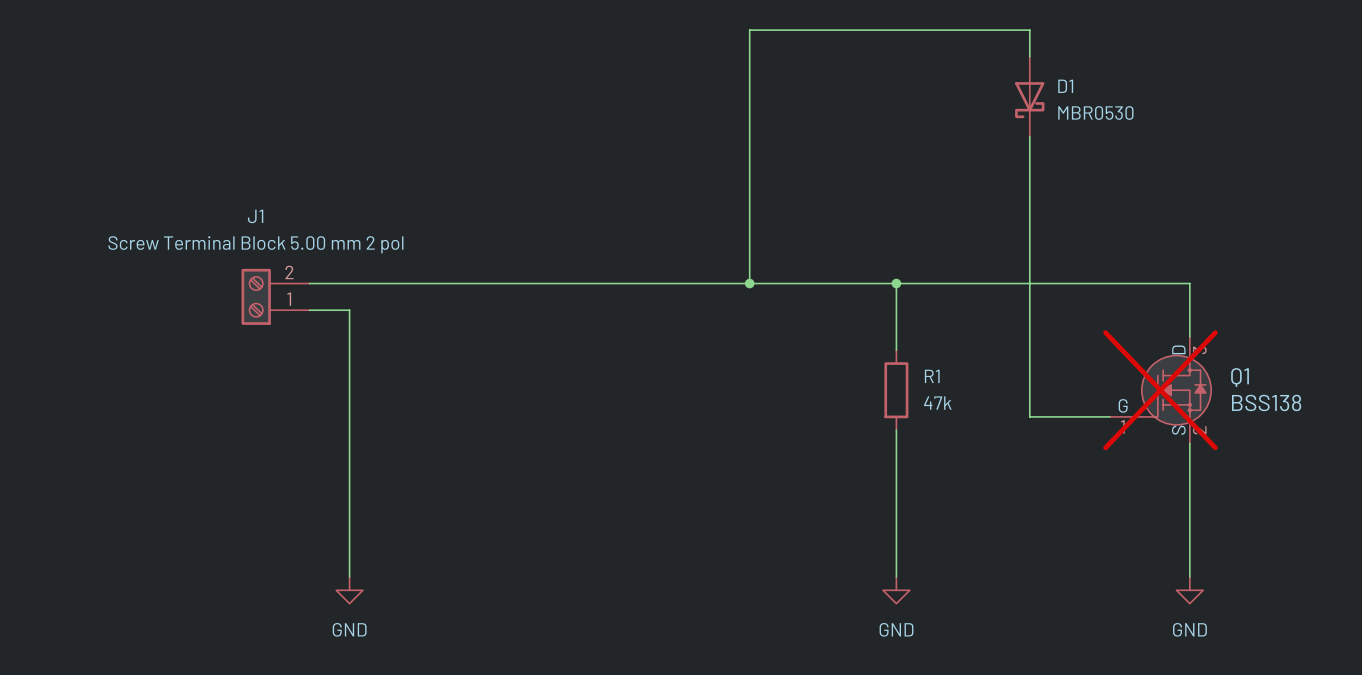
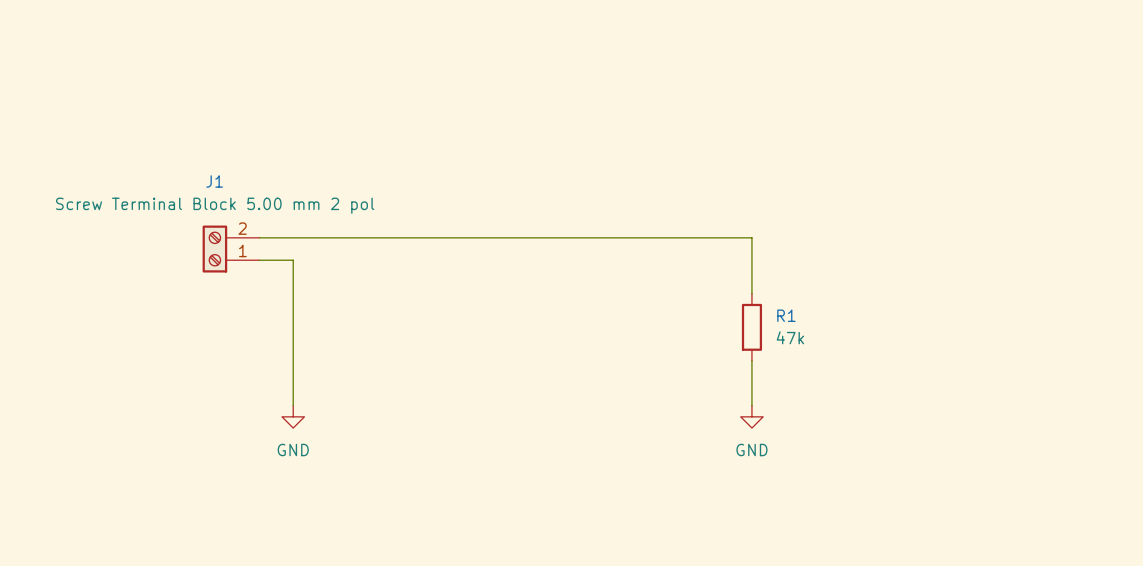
wire: (1029, 56) (1029, 30) (749, 30) (749, 283) -> none
D1: MBR0530 (1029, 96) -> none
wire: (1029, 136) (1029, 416) (1109, 416) -> none
junction: (749, 283) -> none
wire: (896, 283) (1189, 283) (1189, 336) -> none
junction: (896, 283) -> none
Q1: BSS138 (1160, 390) -> none
wire: (1189, 443) (1189, 576) -> none
wire: (349, 483) (349, 576) -> none
wire: (896, 483) (896, 576) -> none
power symbol position: GND (349, 590) -> GND (293, 416)
power symbol position: GND (896, 590) -> GND (751, 416)
power symbol: GND (1189, 590) -> none

